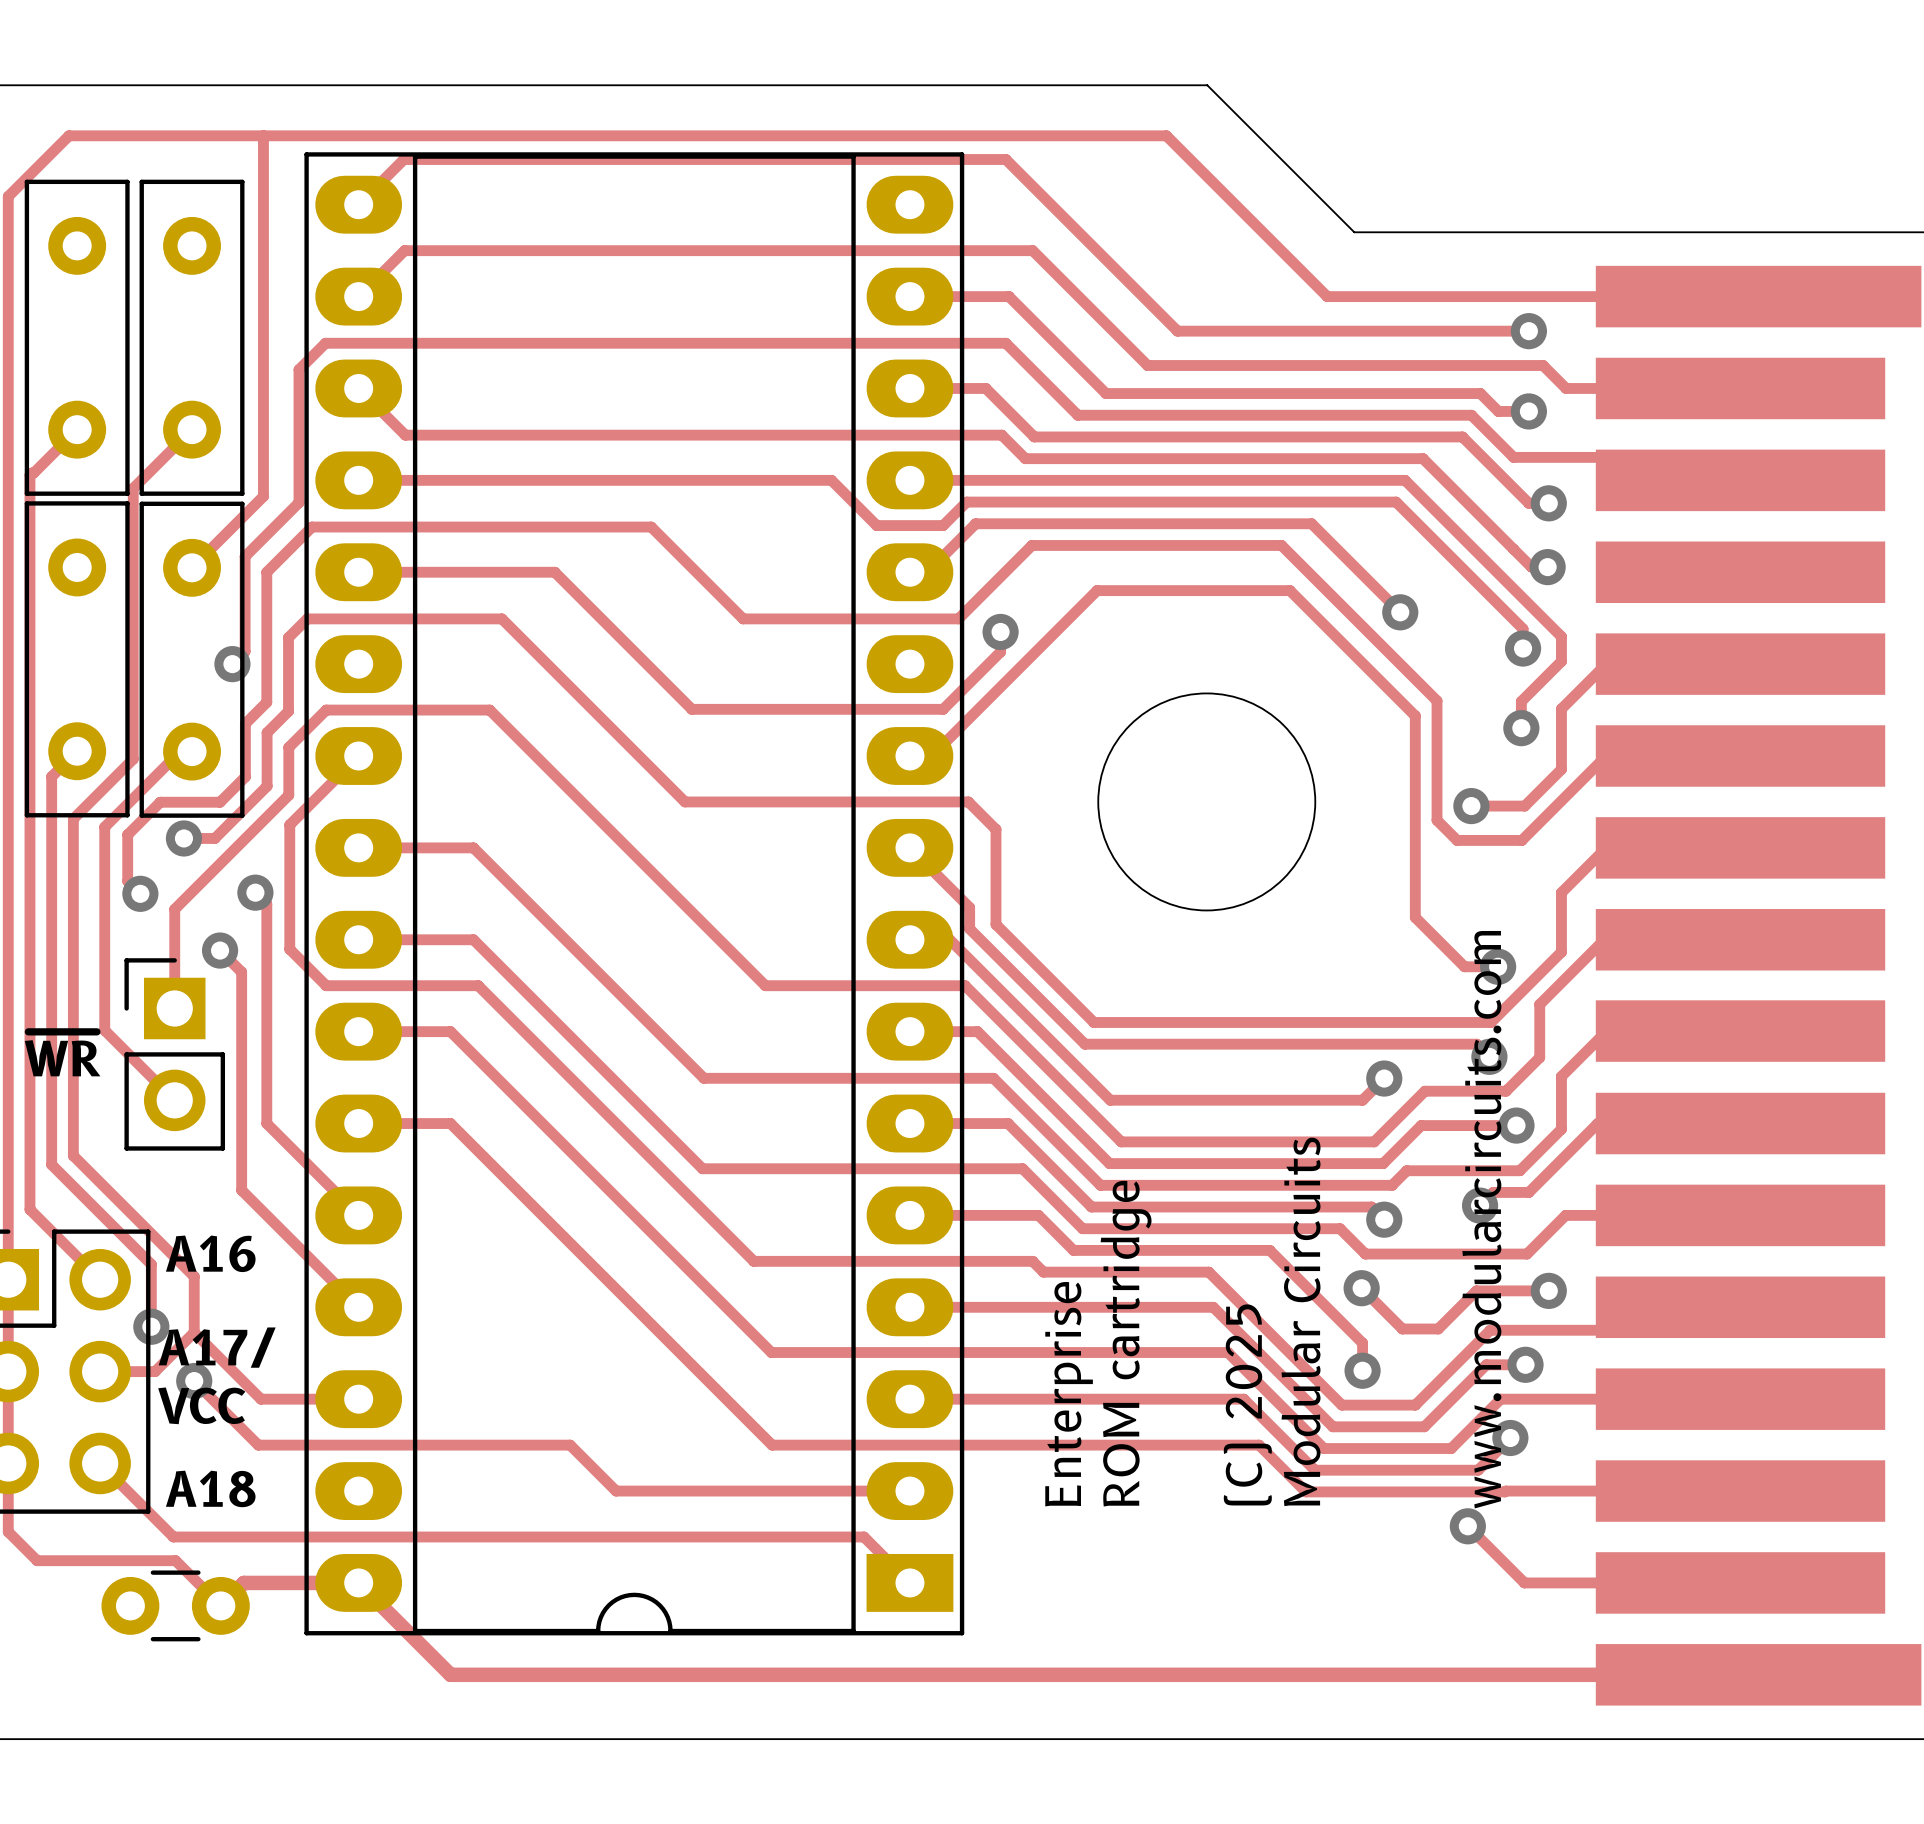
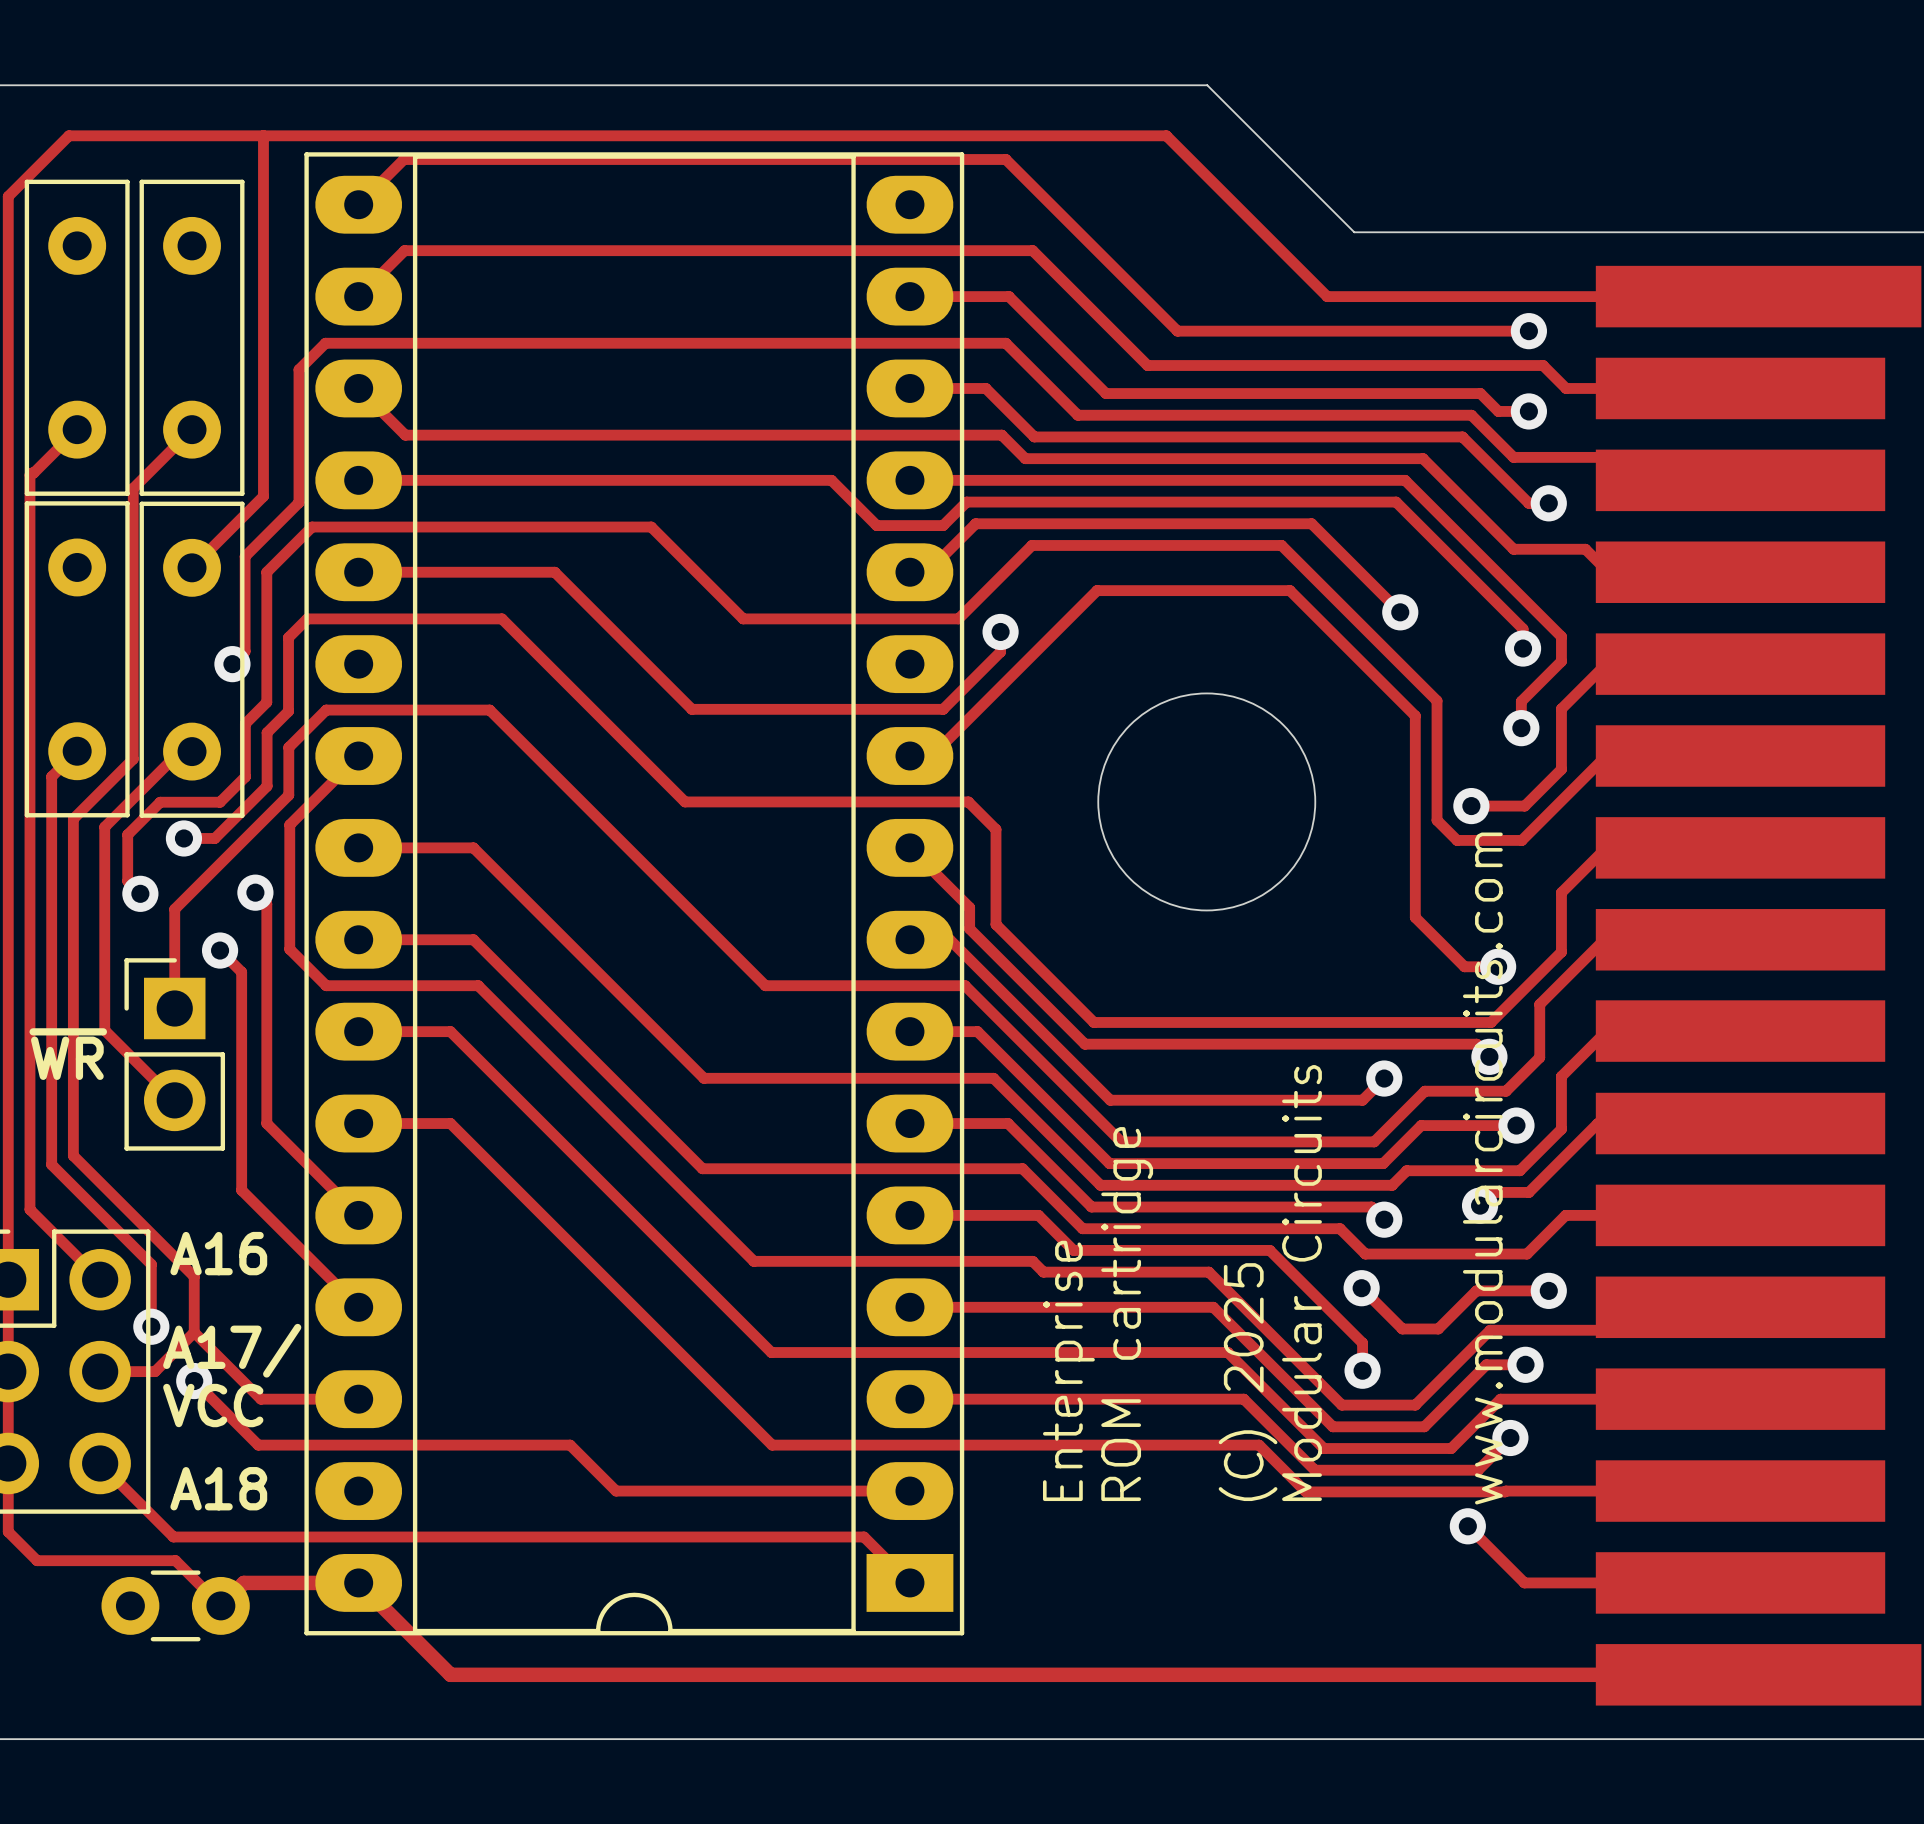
track: (1513, 549) (1531, 567) (1547, 567) -> (1513, 549) (1585, 549) (1608, 572)
via: (1547, 567) -> none

